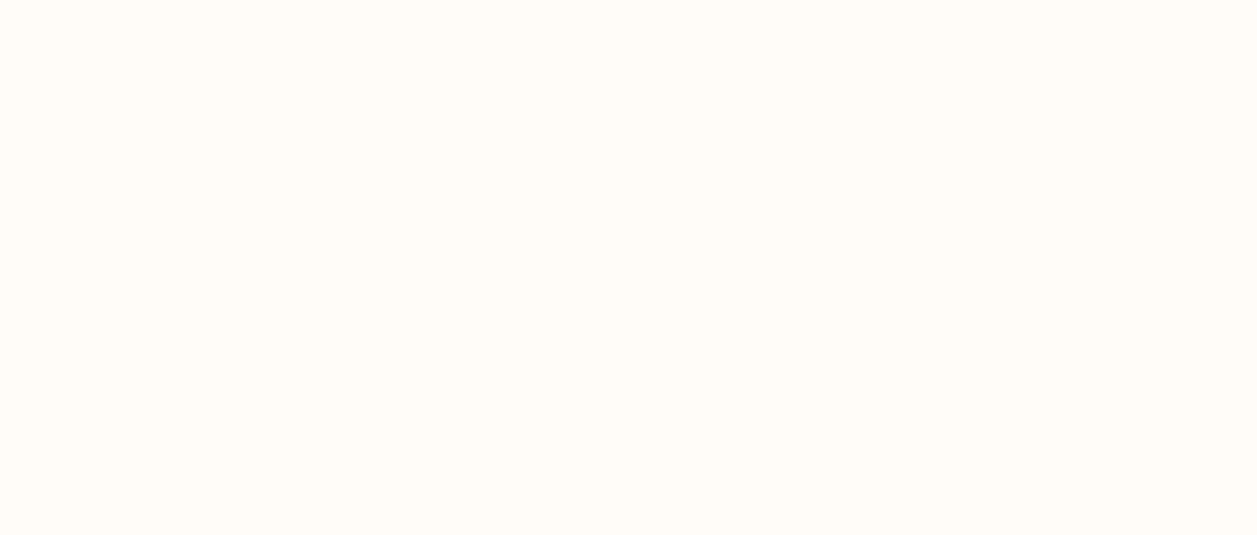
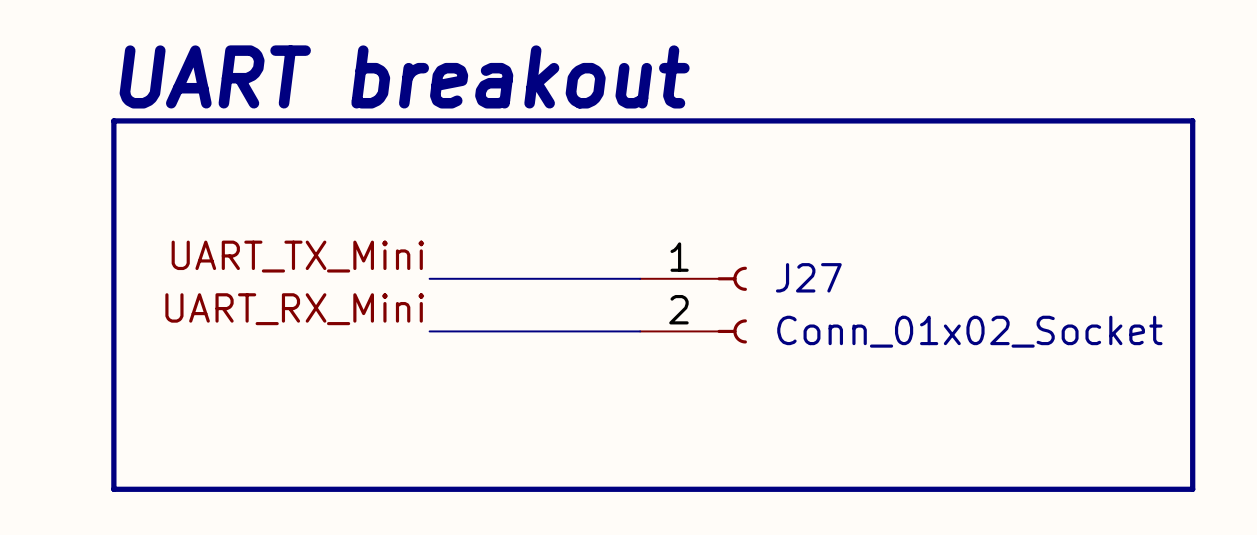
text: none -> UART breakout (404, 76)
line: none -> (113, 120) (1192, 120) (1192, 489) (113, 489) (113, 120)
label: none -> UART_TX_Mini (297, 256)
wire: none -> (429, 278) (640, 278)
J27: none -> Conn_01x02_Socket (693, 305)
label: none -> UART_RX_Mini (294, 309)
wire: none -> (429, 331) (640, 331)

